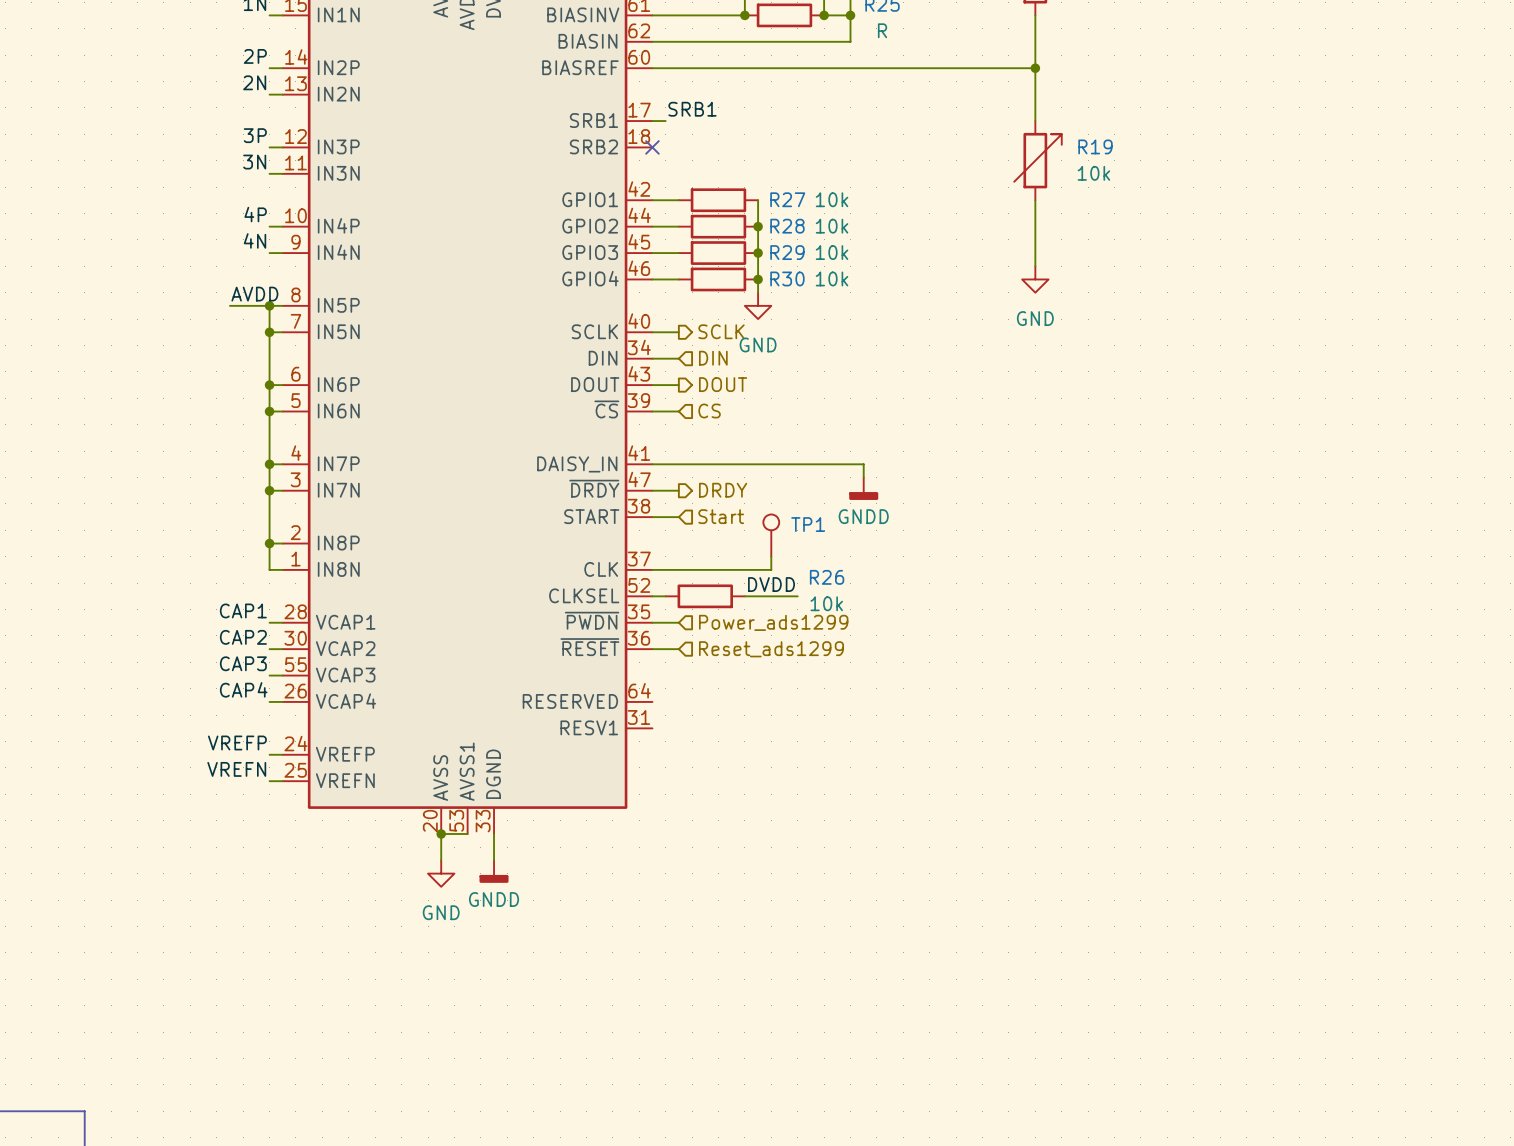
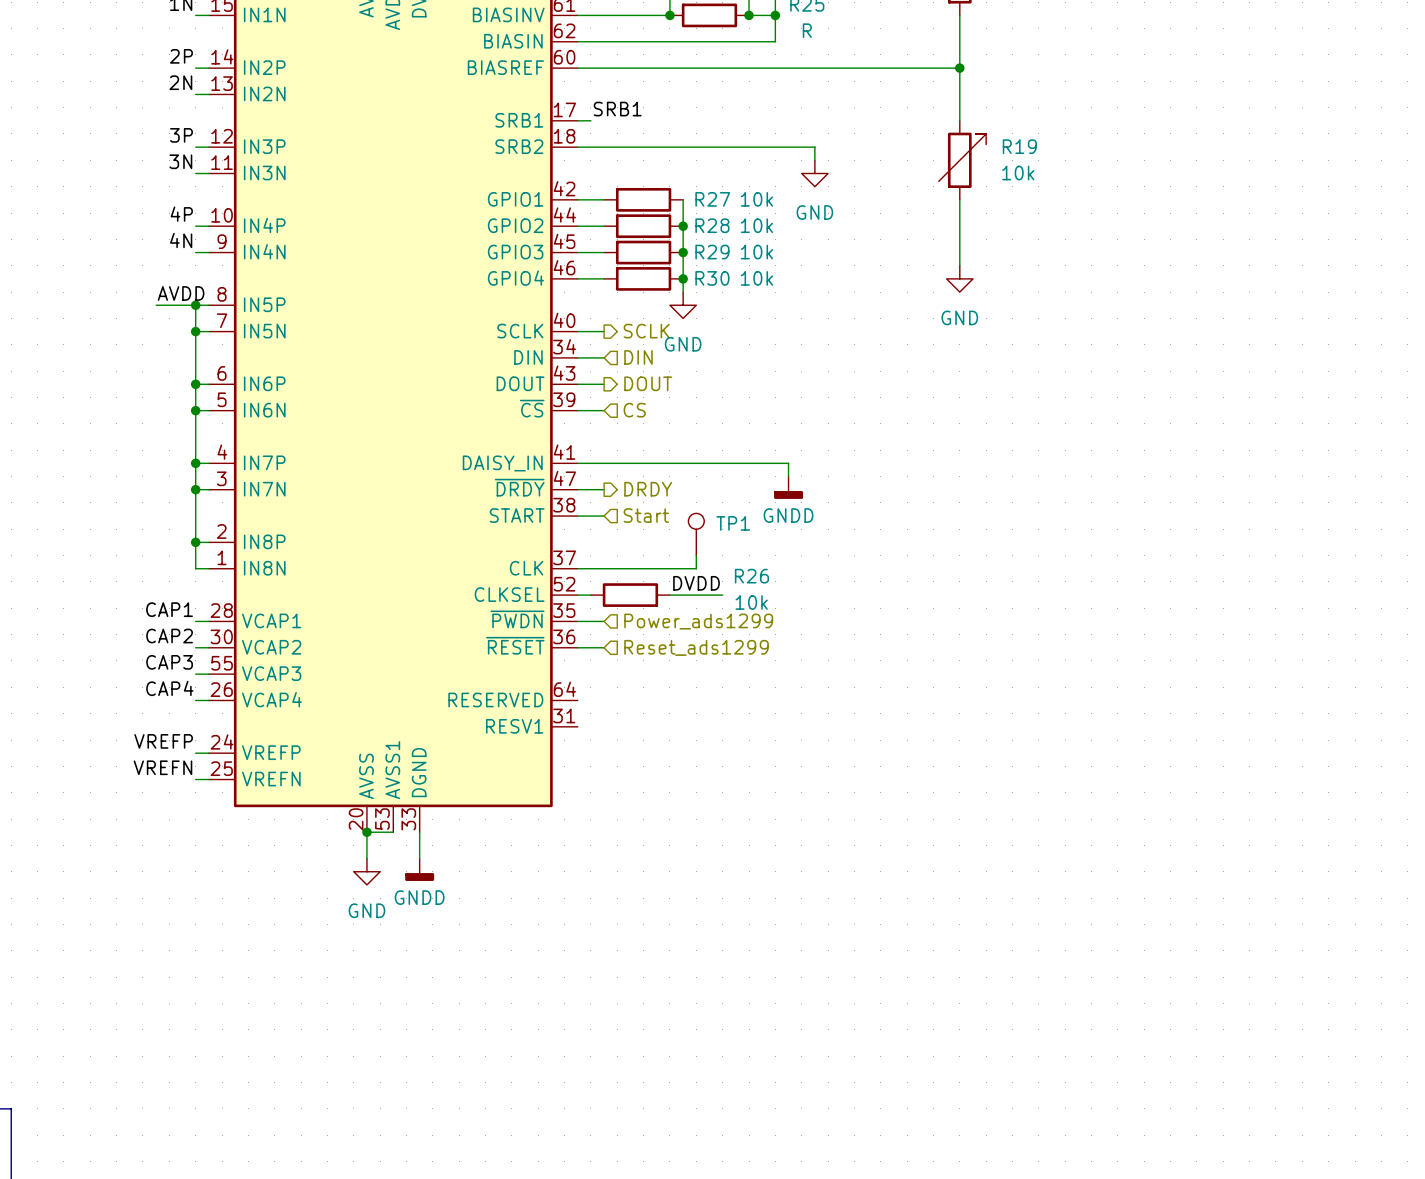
wire: none -> (577, 147) (814, 147) (814, 160)
no-connect mark: (652, 147) -> none
power symbol: none -> GND (814, 173)

